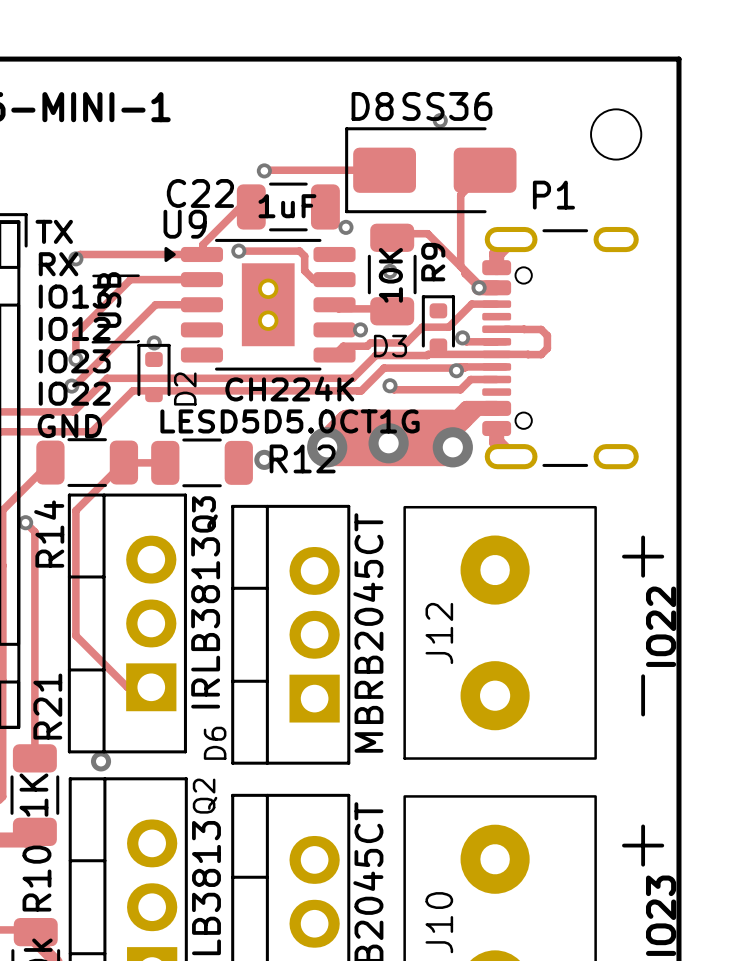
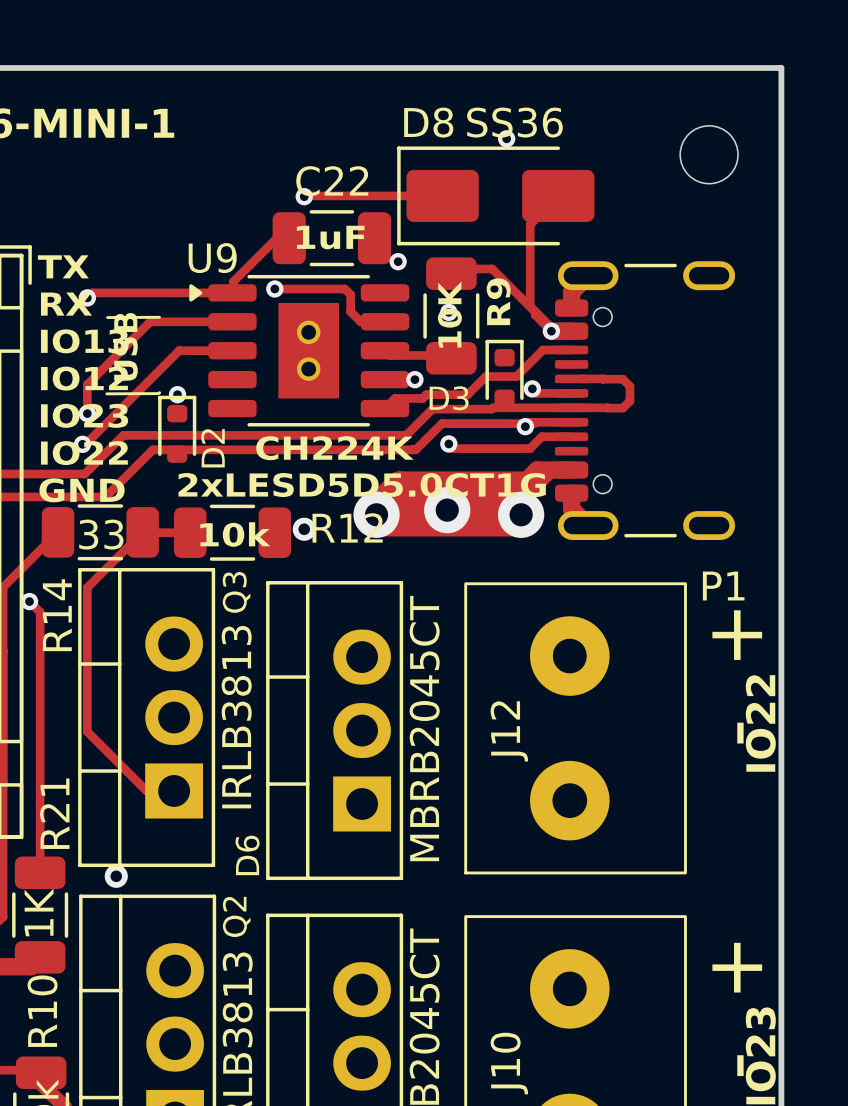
C22 name position: C22 (200, 193) -> C22 (332, 181)
P1 name position: P1 (553, 195) -> P1 (723, 586)
D3 value: LESD5D5.0CT1G (290, 421) -> 2xLESD5D5.0CT1G (362, 485)
R14 value: none -> 33 (101, 534)
R12 value: none -> 10k (235, 534)

